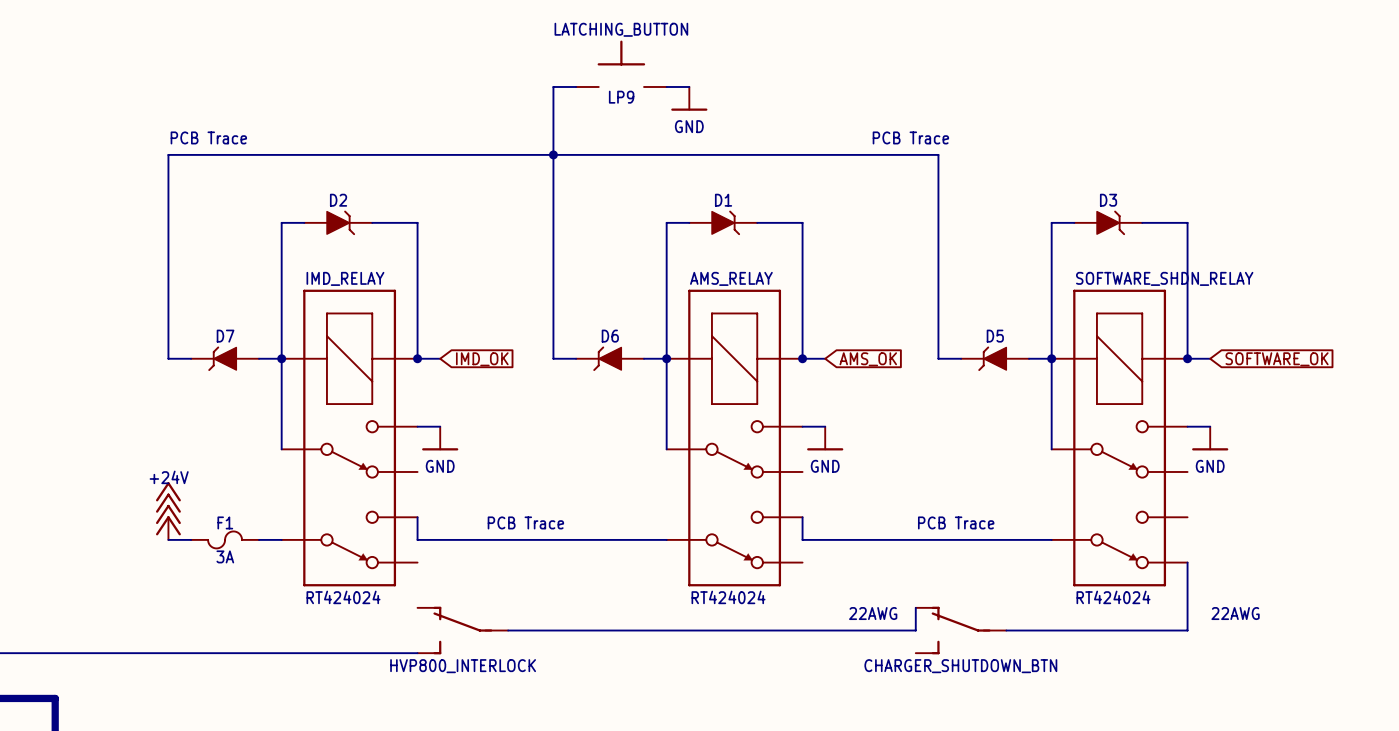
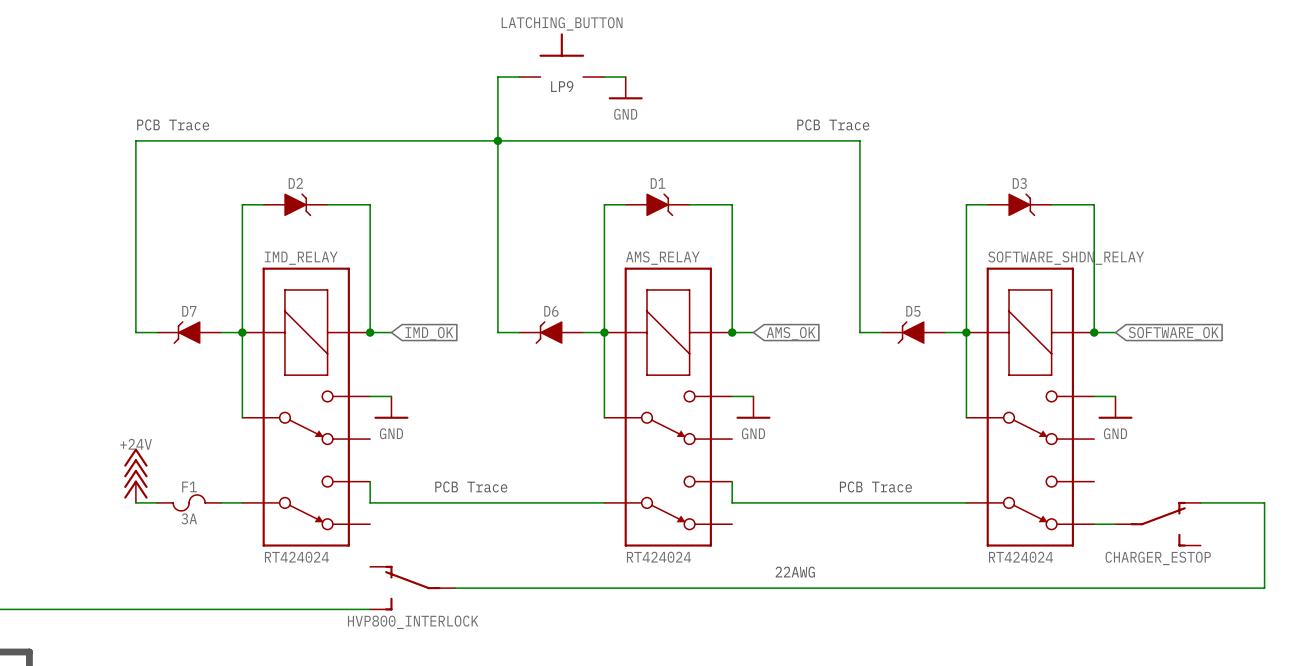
wire: none -> (1200, 502) (1264, 502) (1264, 588) (1094, 588)
wire: (1187, 562) (1187, 630) -> (1094, 524) (1115, 524)
part: none -> (1158, 524)
wire: (915, 607) (915, 630) -> (923, 588) (838, 588)
text: 22AWG (1235, 613) -> none
part: (961, 630) -> none

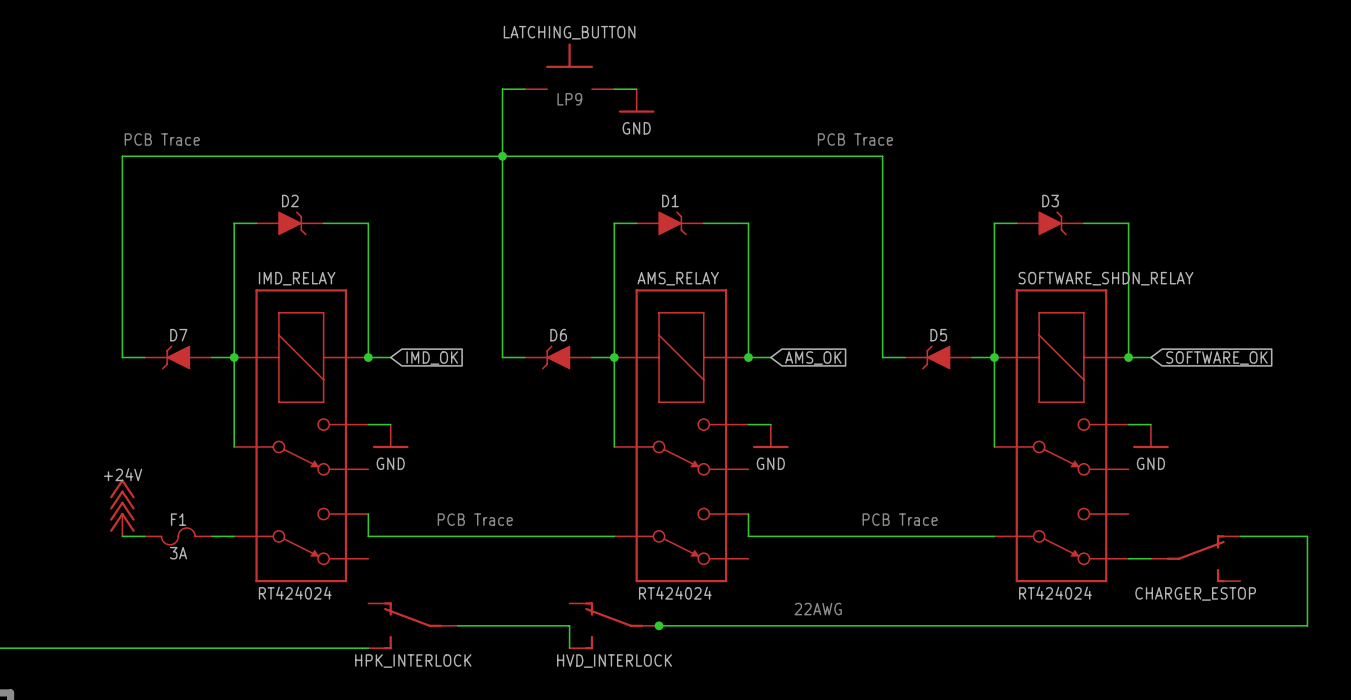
wire: (561, 588) (647, 588) -> (569, 625) (569, 648)
part: none -> (614, 625)
junction: none -> (659, 625)
part text: HVP800_INTERLOCK (413, 622) -> HPK_INTERLOCK (413, 661)

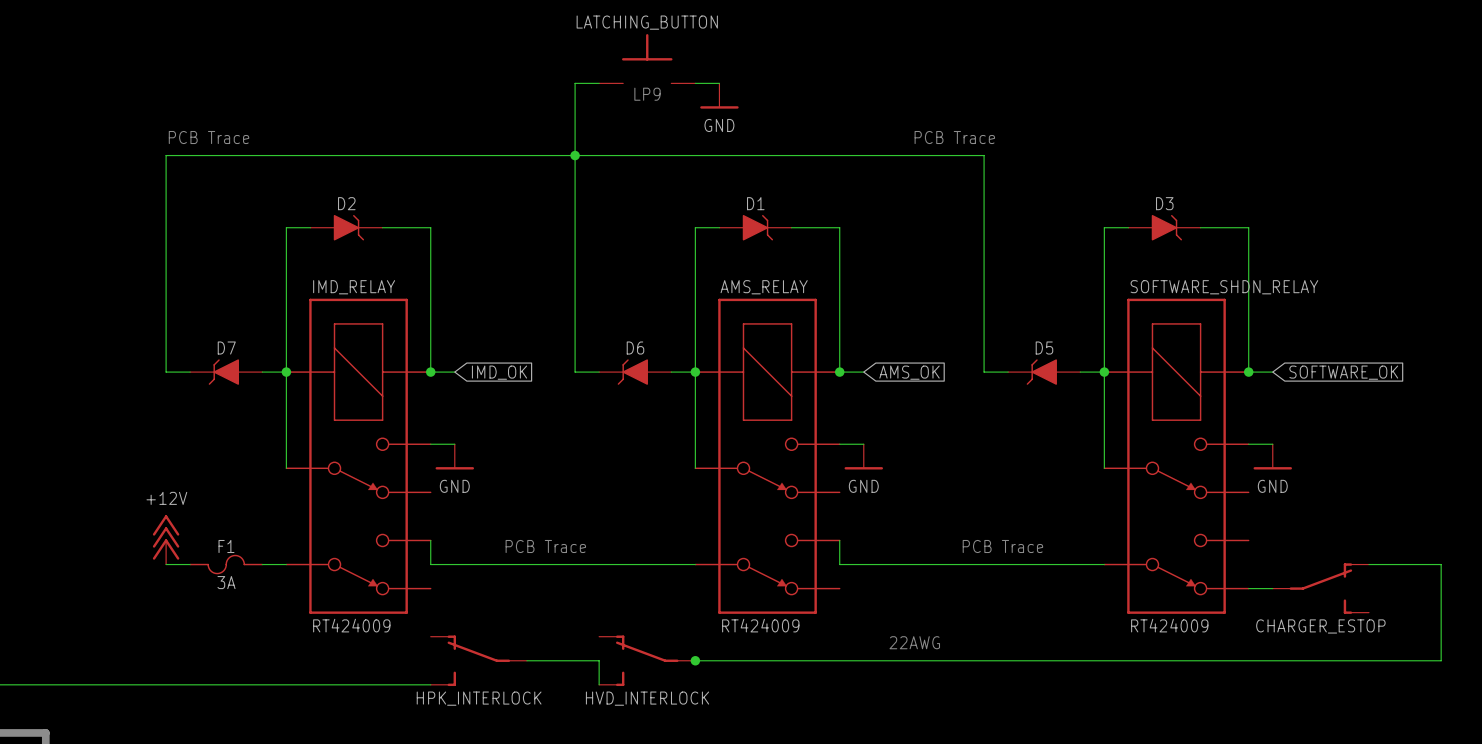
power symbol: +24V (122, 507) -> +12V (166, 539)
IMD_RELAY text: RT424024 (295, 593) -> RT424009 (351, 625)
AMS_RELAY text: RT424024 (675, 593) -> RT424009 (760, 625)
SOFTWARE_SHDN_RELAY text: RT424024 (1055, 593) -> RT424009 (1169, 625)
wire: (524, 625) (569, 625) (569, 648) -> (599, 660) (599, 684)
part position: (614, 625) -> (647, 660)
junction position: (659, 625) -> (695, 660)

